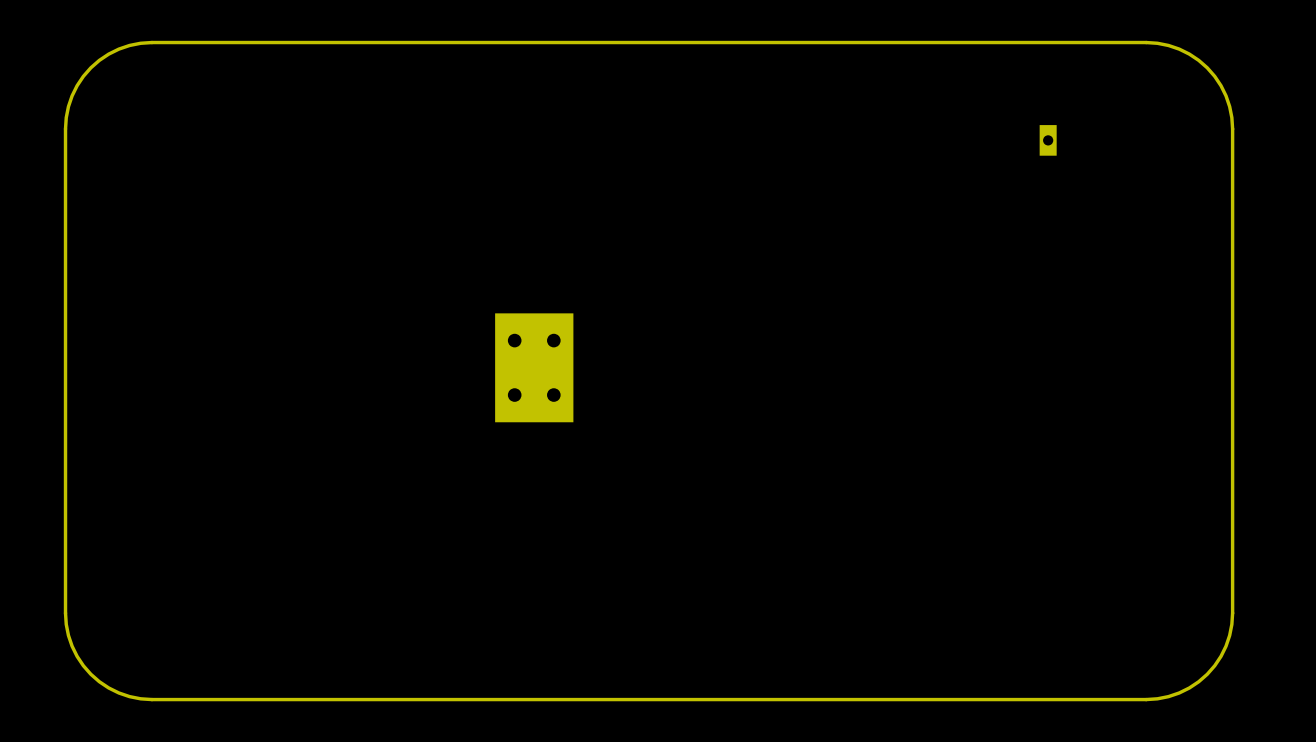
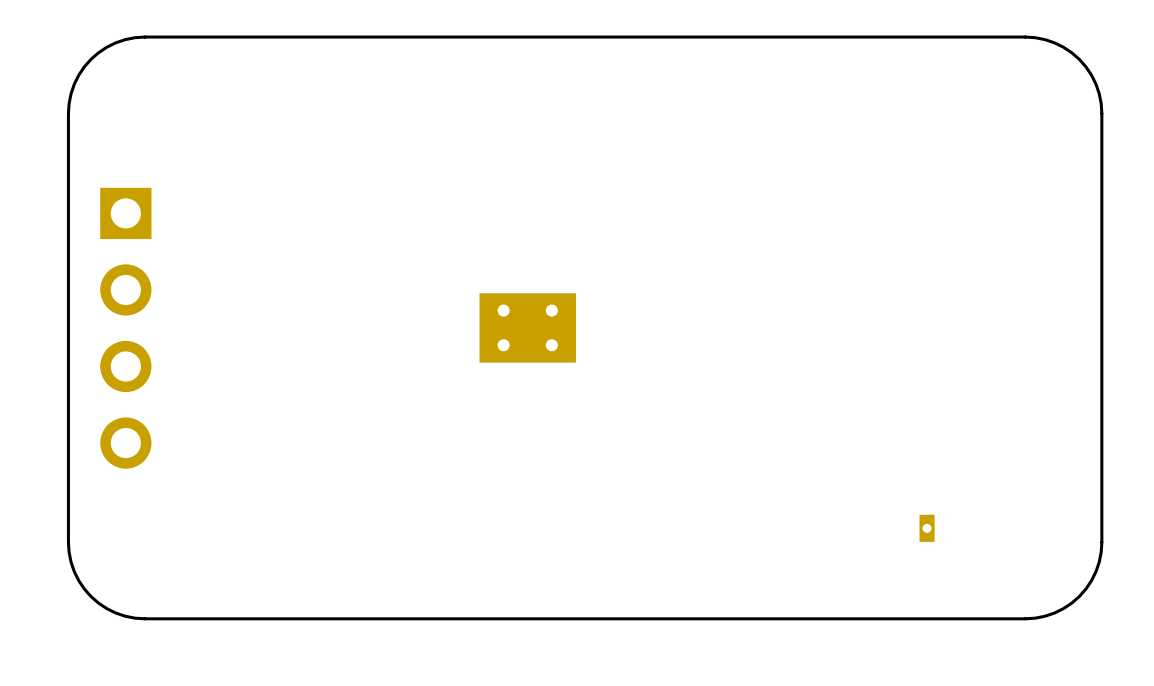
part position: (1048, 140) -> (927, 528)
part rotation: 0° (534, 367) -> 90° clockwise (527, 327)
part: none -> (125, 328)

